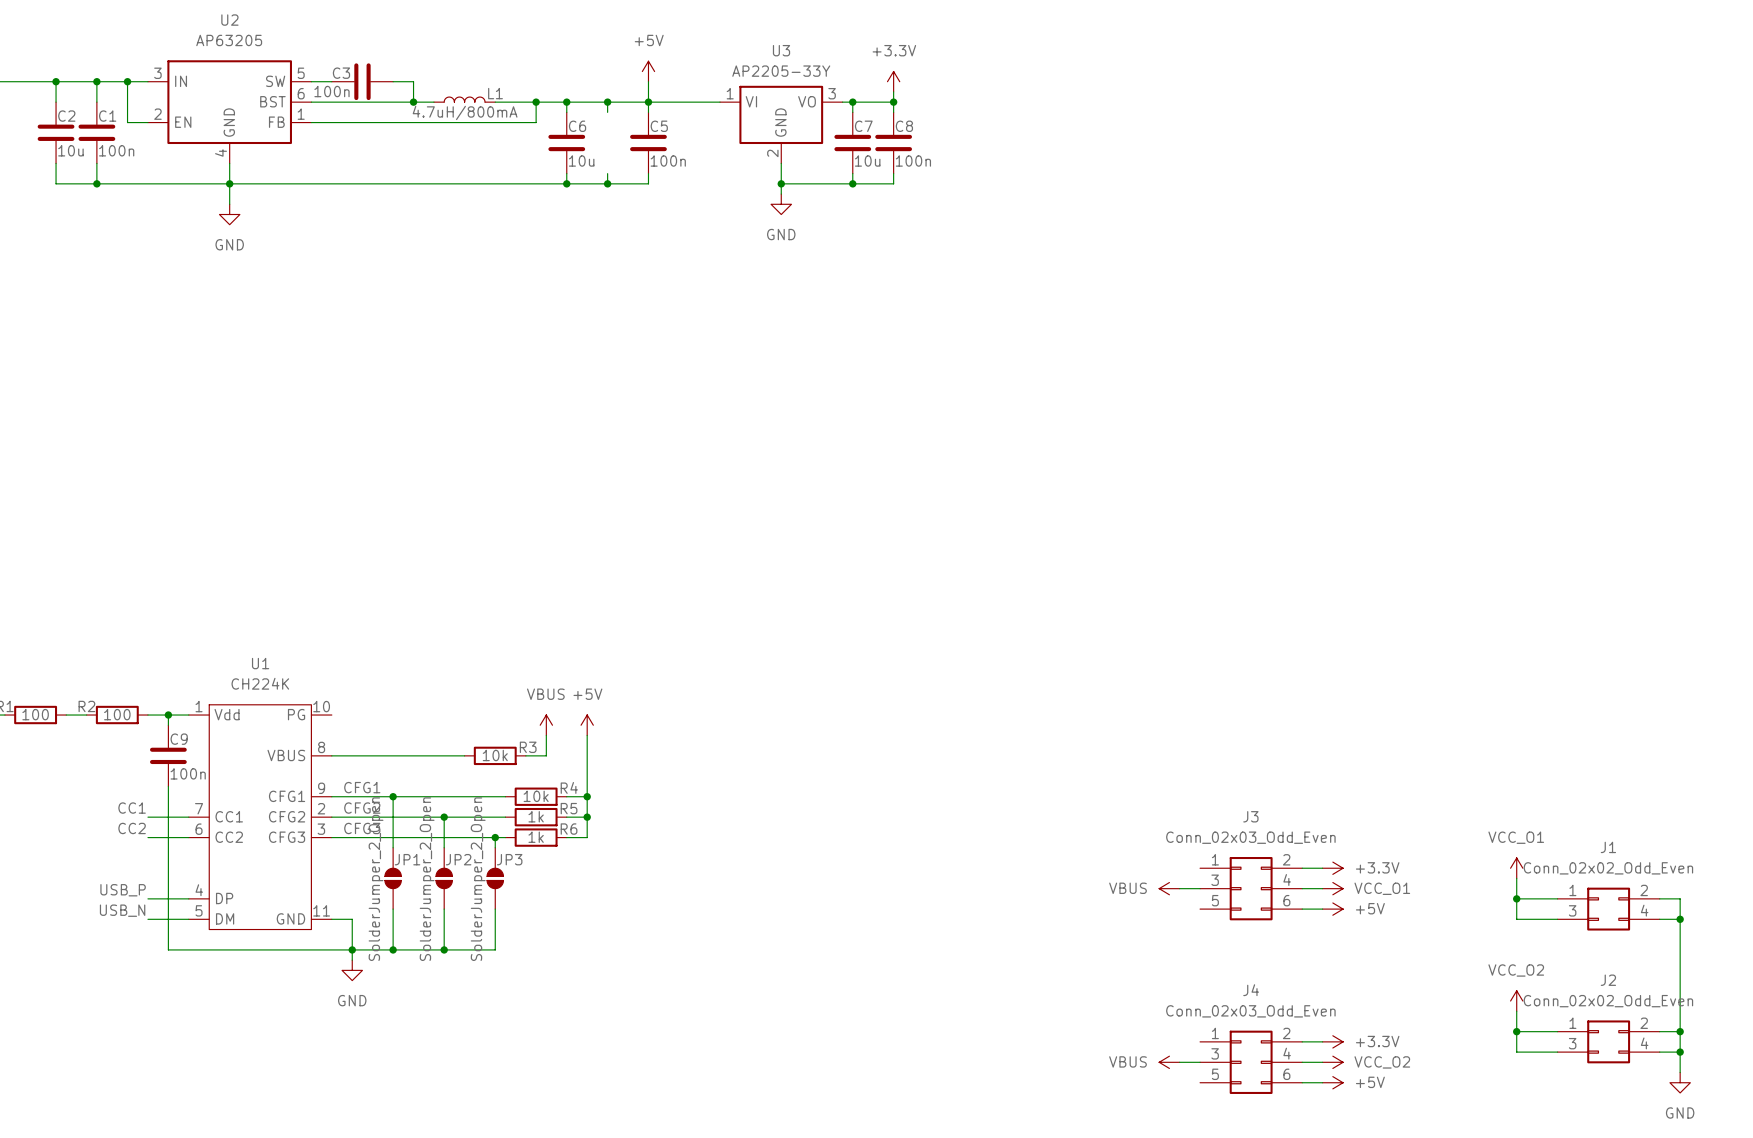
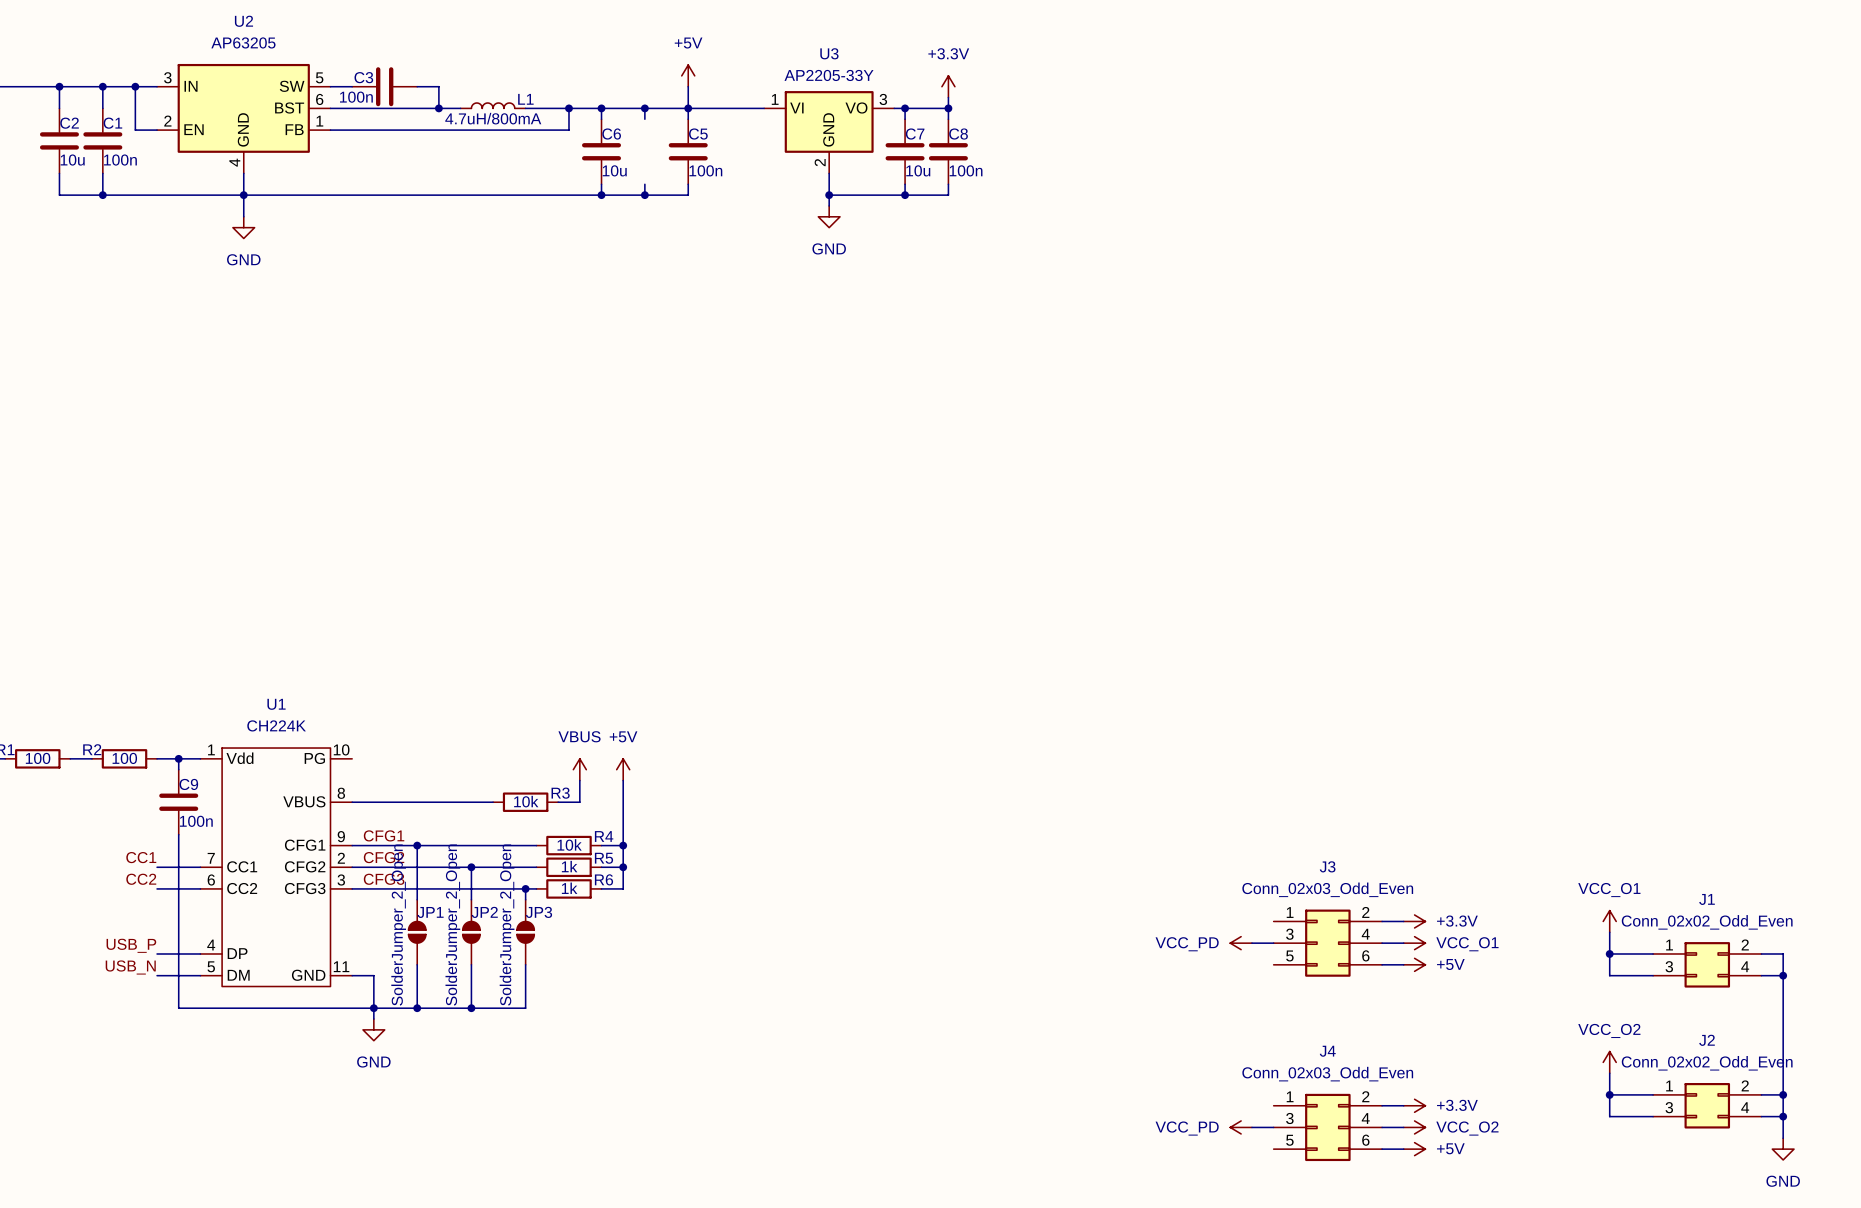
power symbol: VBUS (1169, 888) -> VCC_PD (1241, 943)
power symbol: VBUS (1169, 1062) -> VCC_PD (1241, 1127)

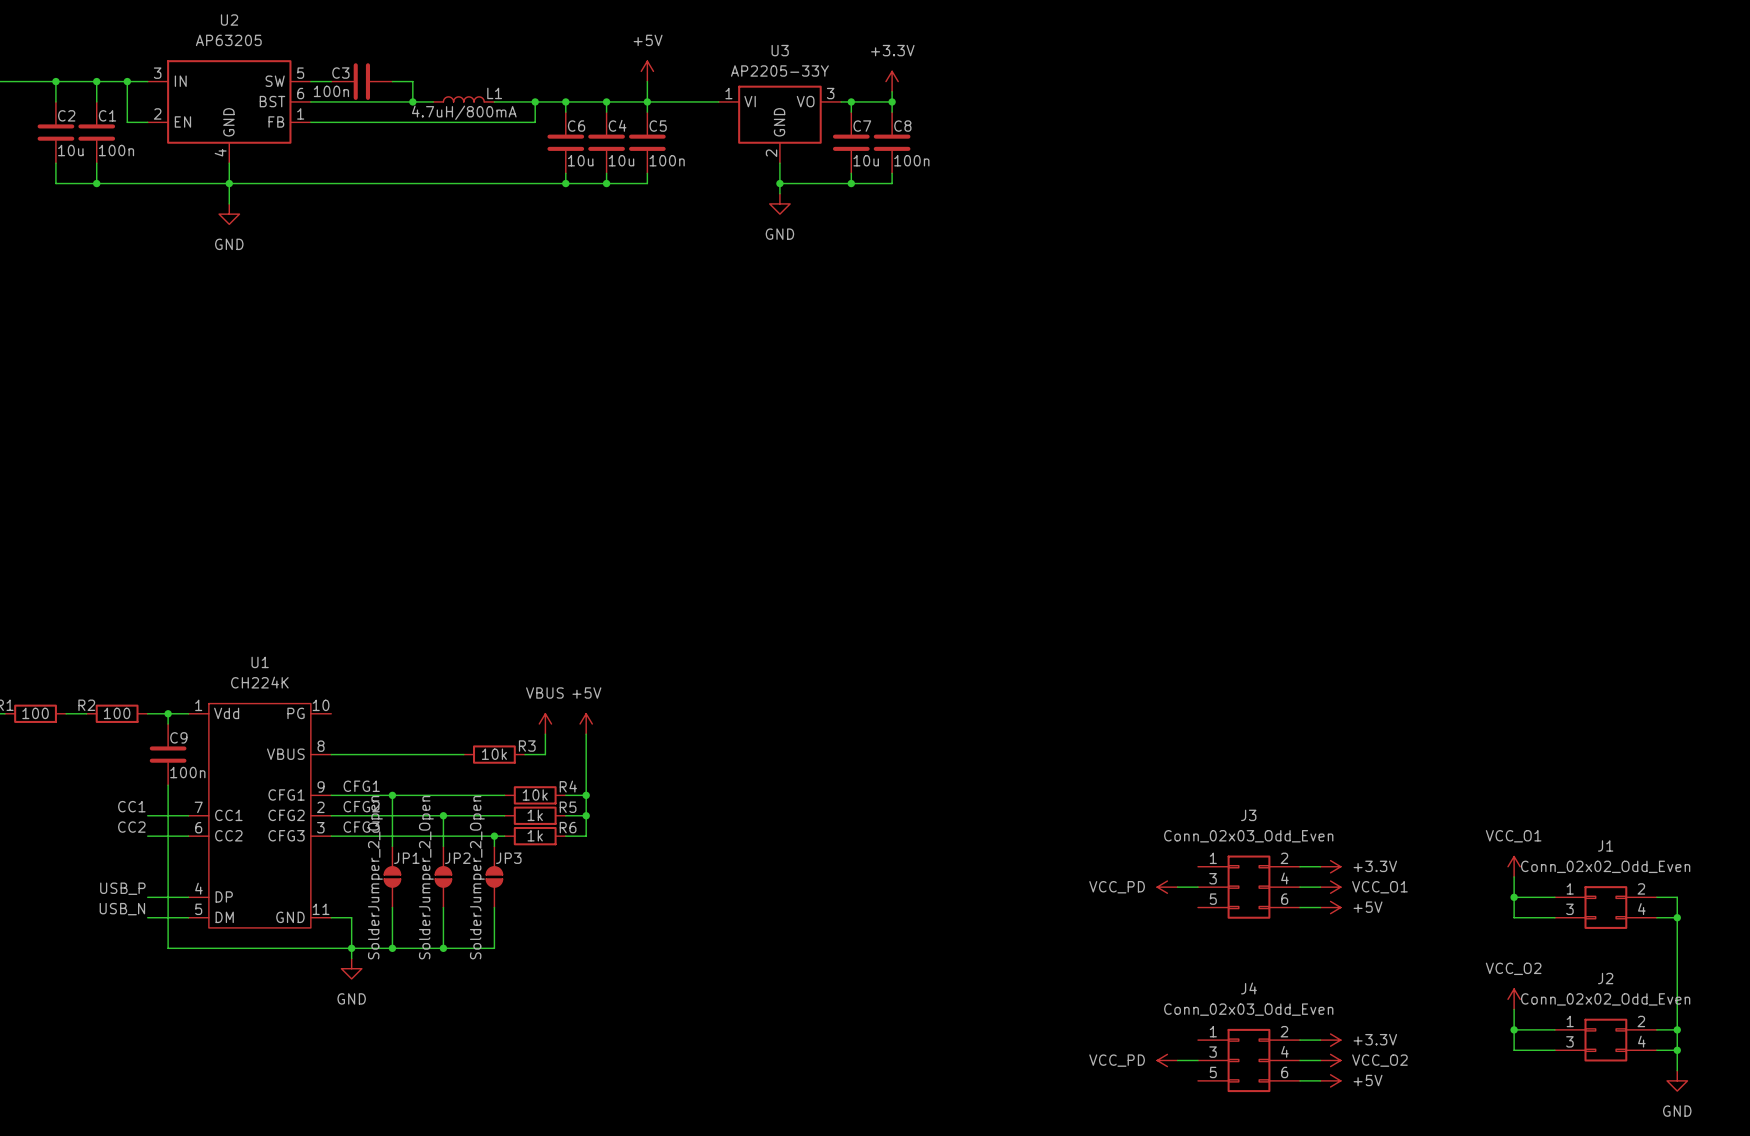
C4: none -> 10u (606, 142)

